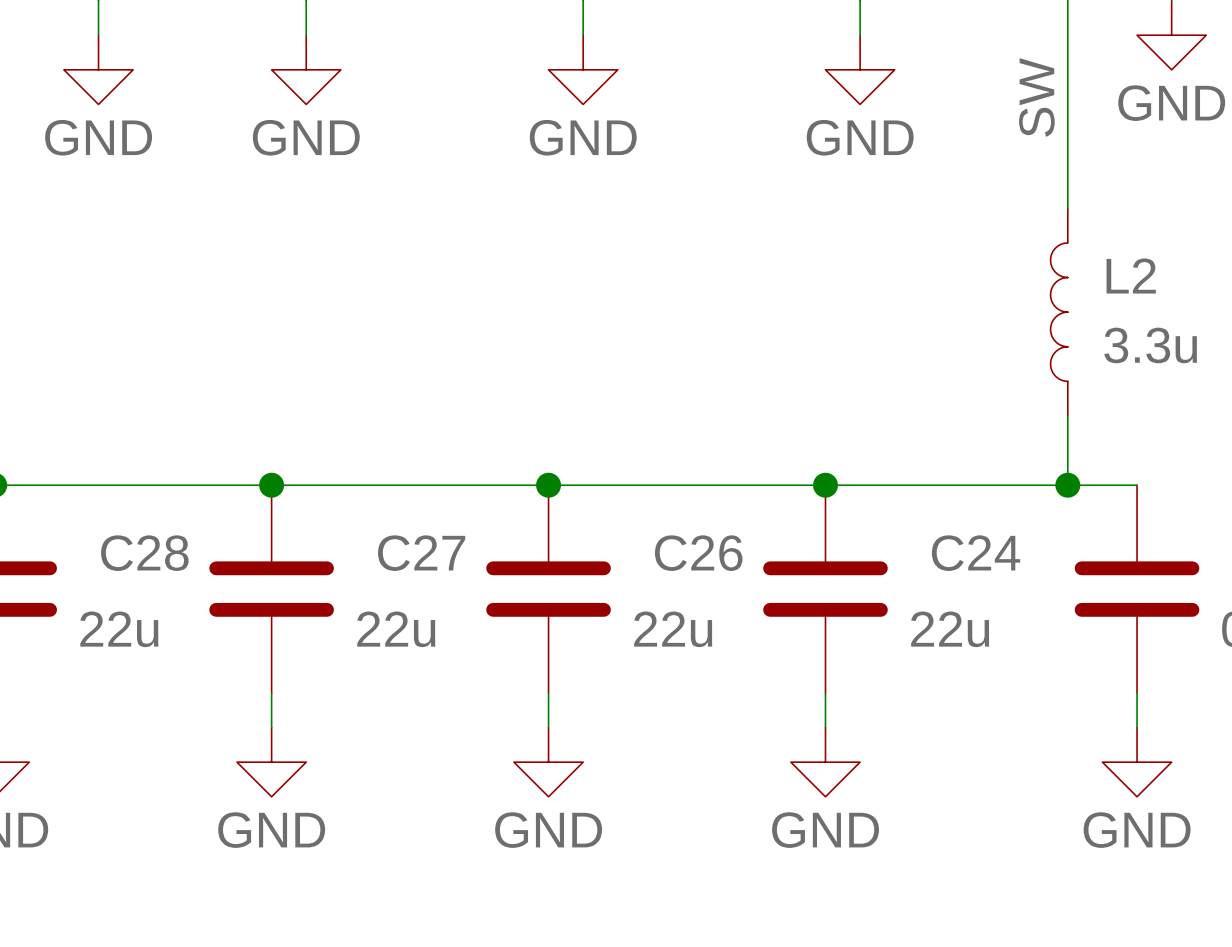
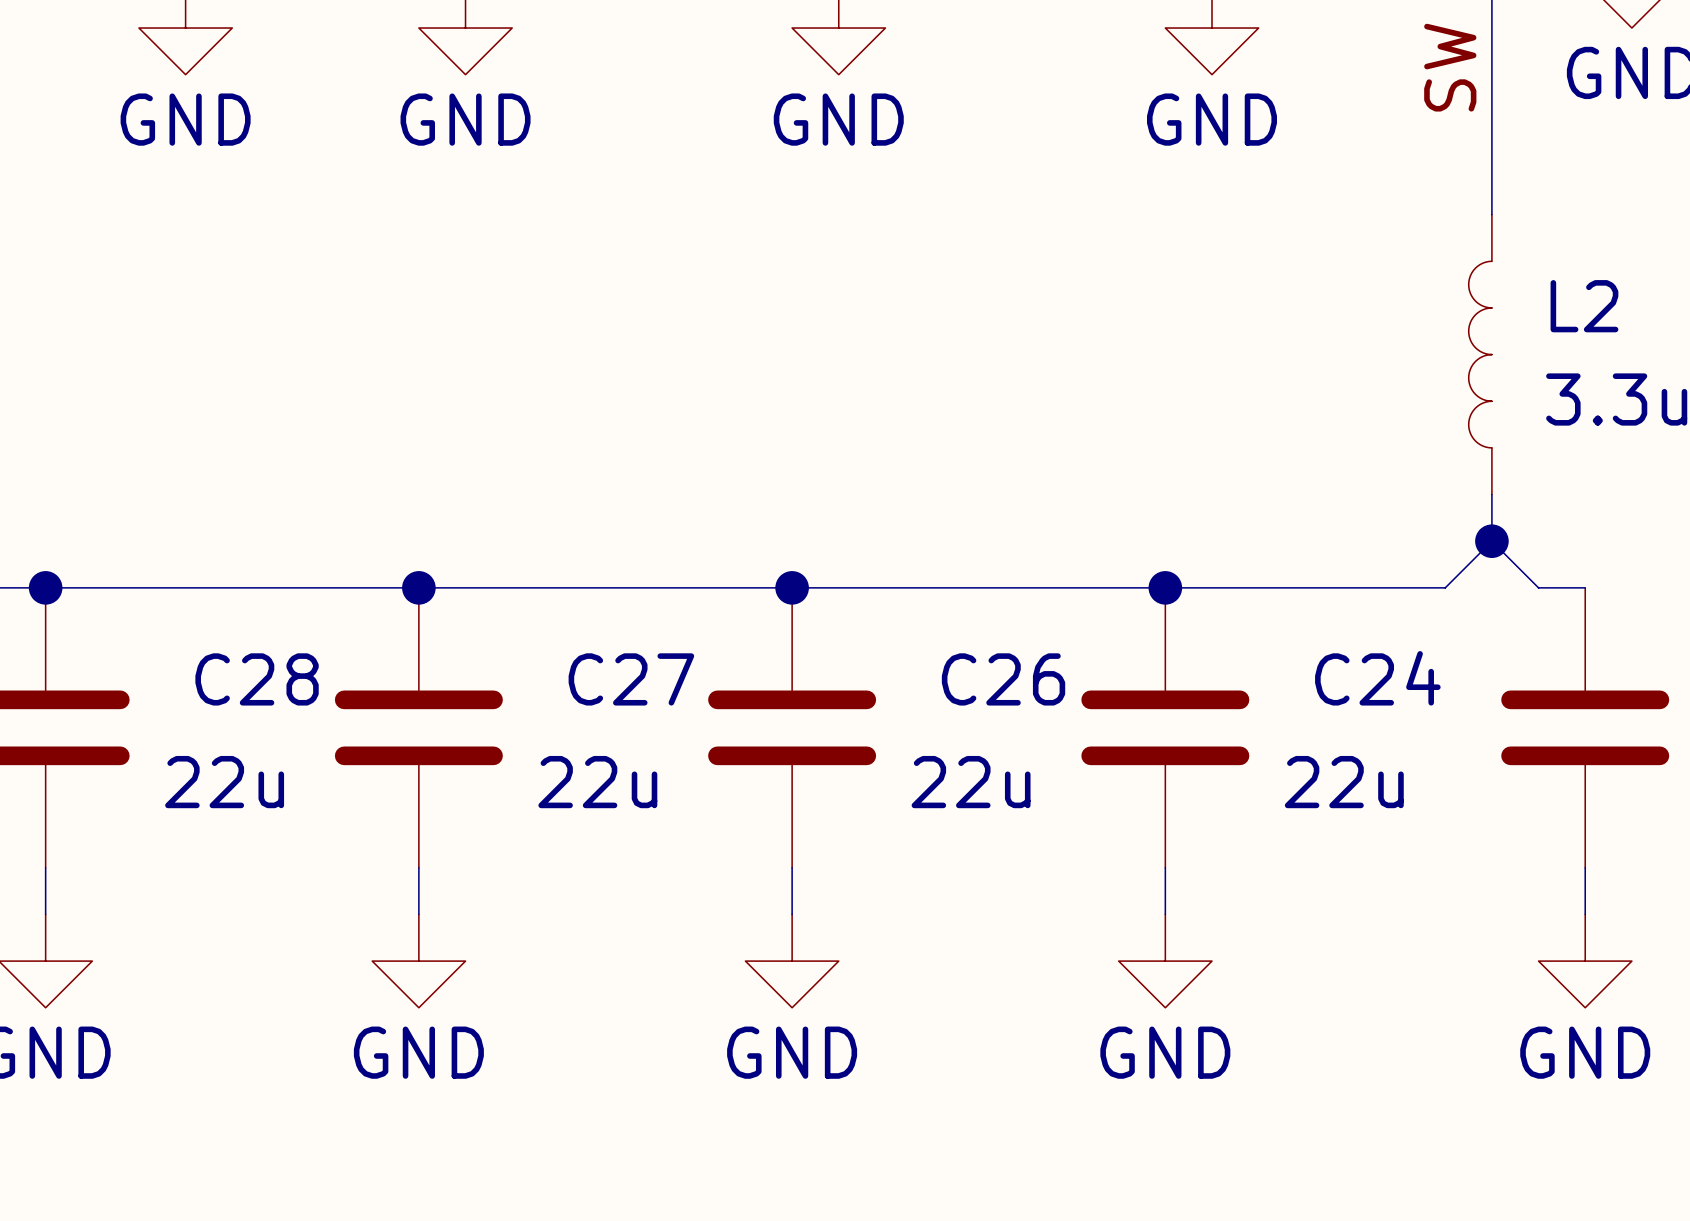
wire: (1067, 450) (1067, 485) -> none
wire: (1033, 485) (1102, 485) -> (1445, 587) (1491, 541) (1538, 587)
junction position: (1067, 485) -> (1491, 541)

